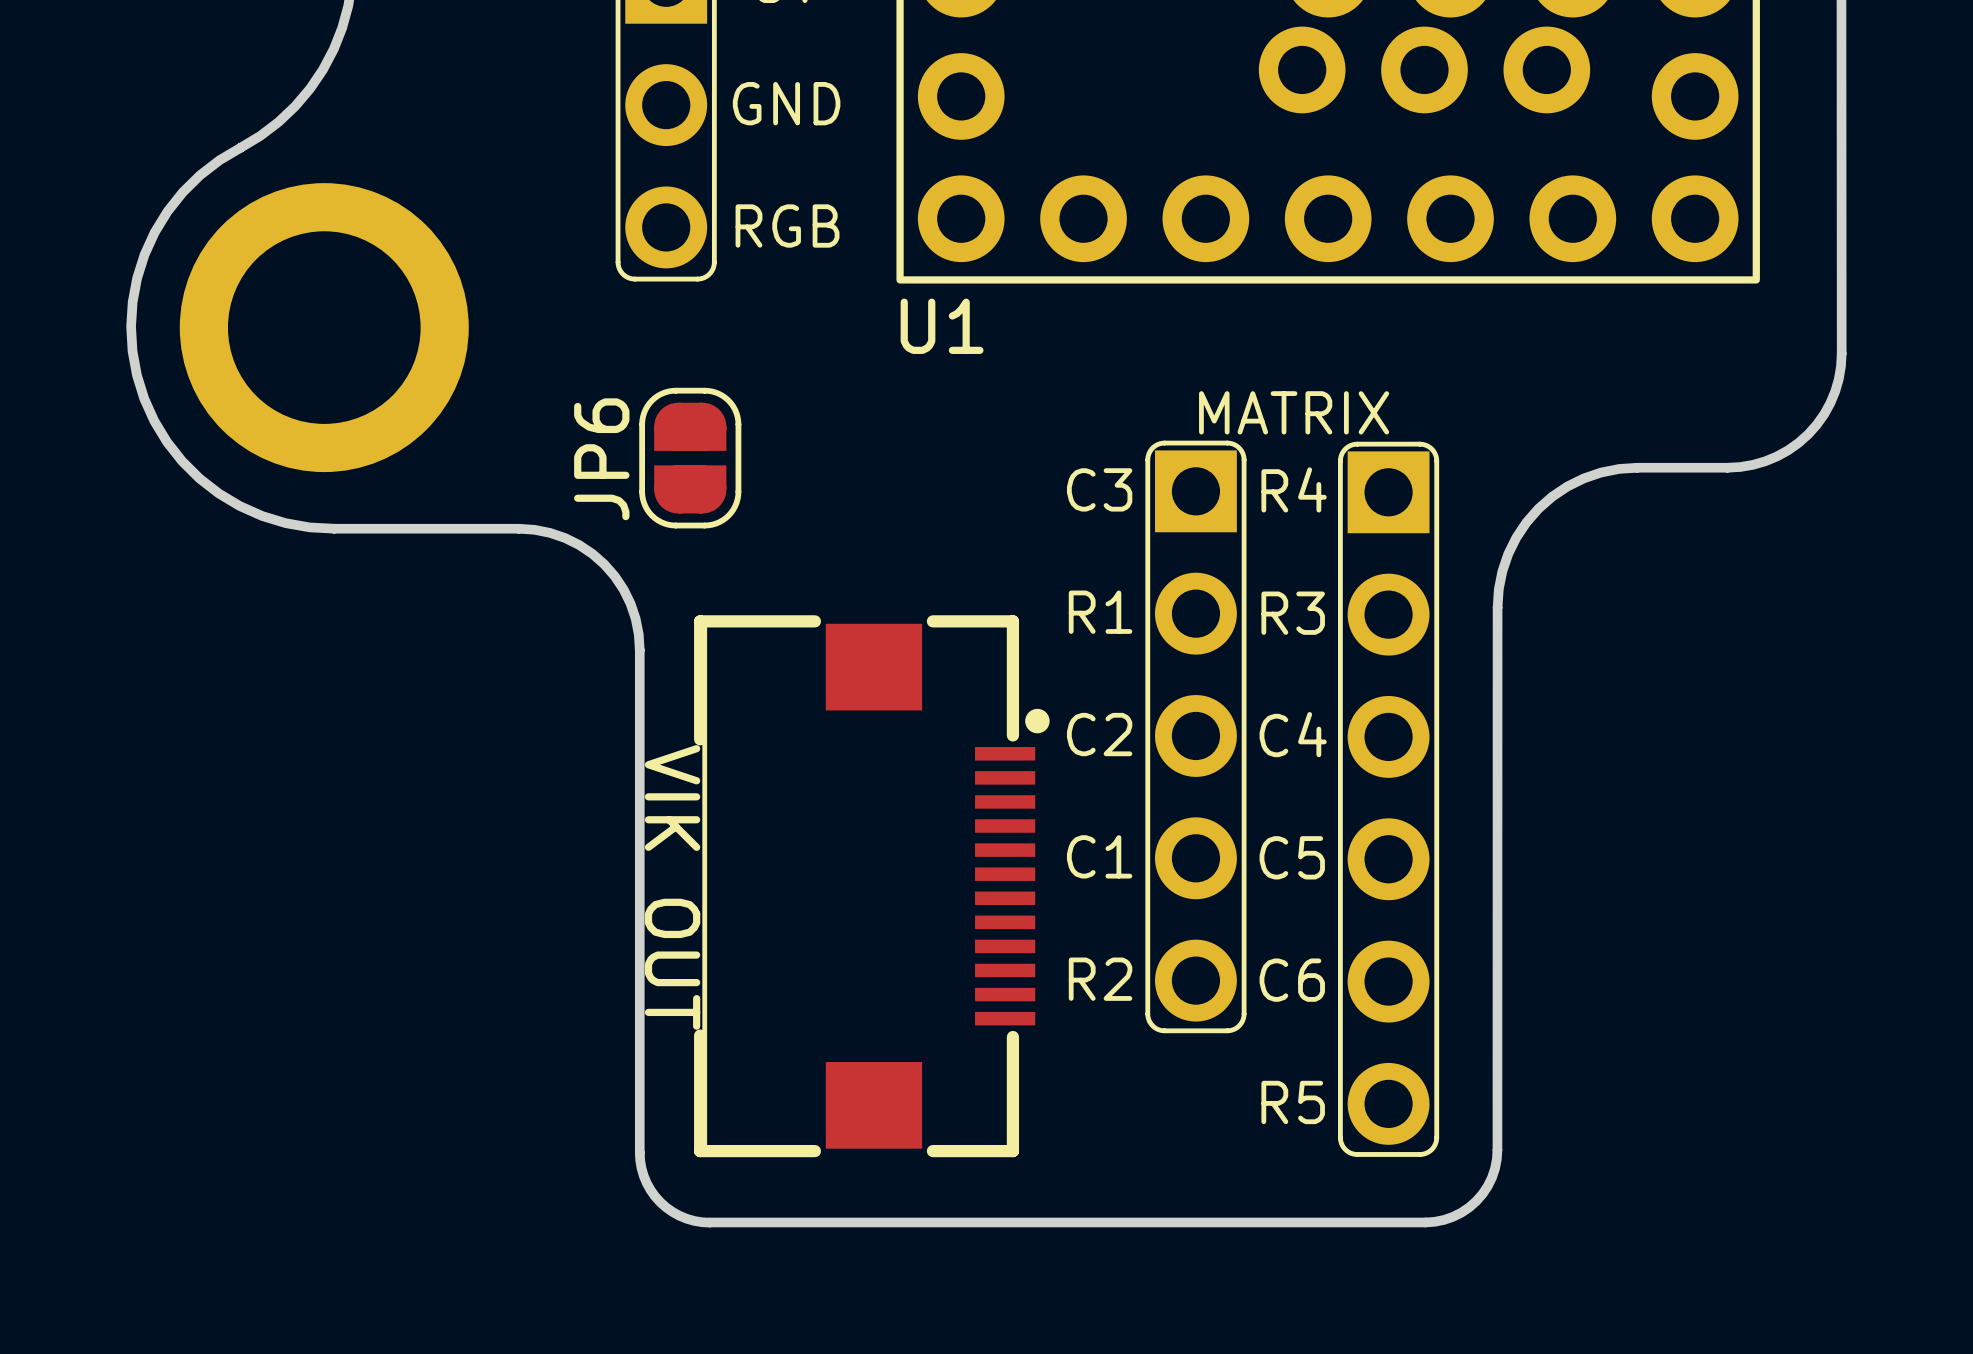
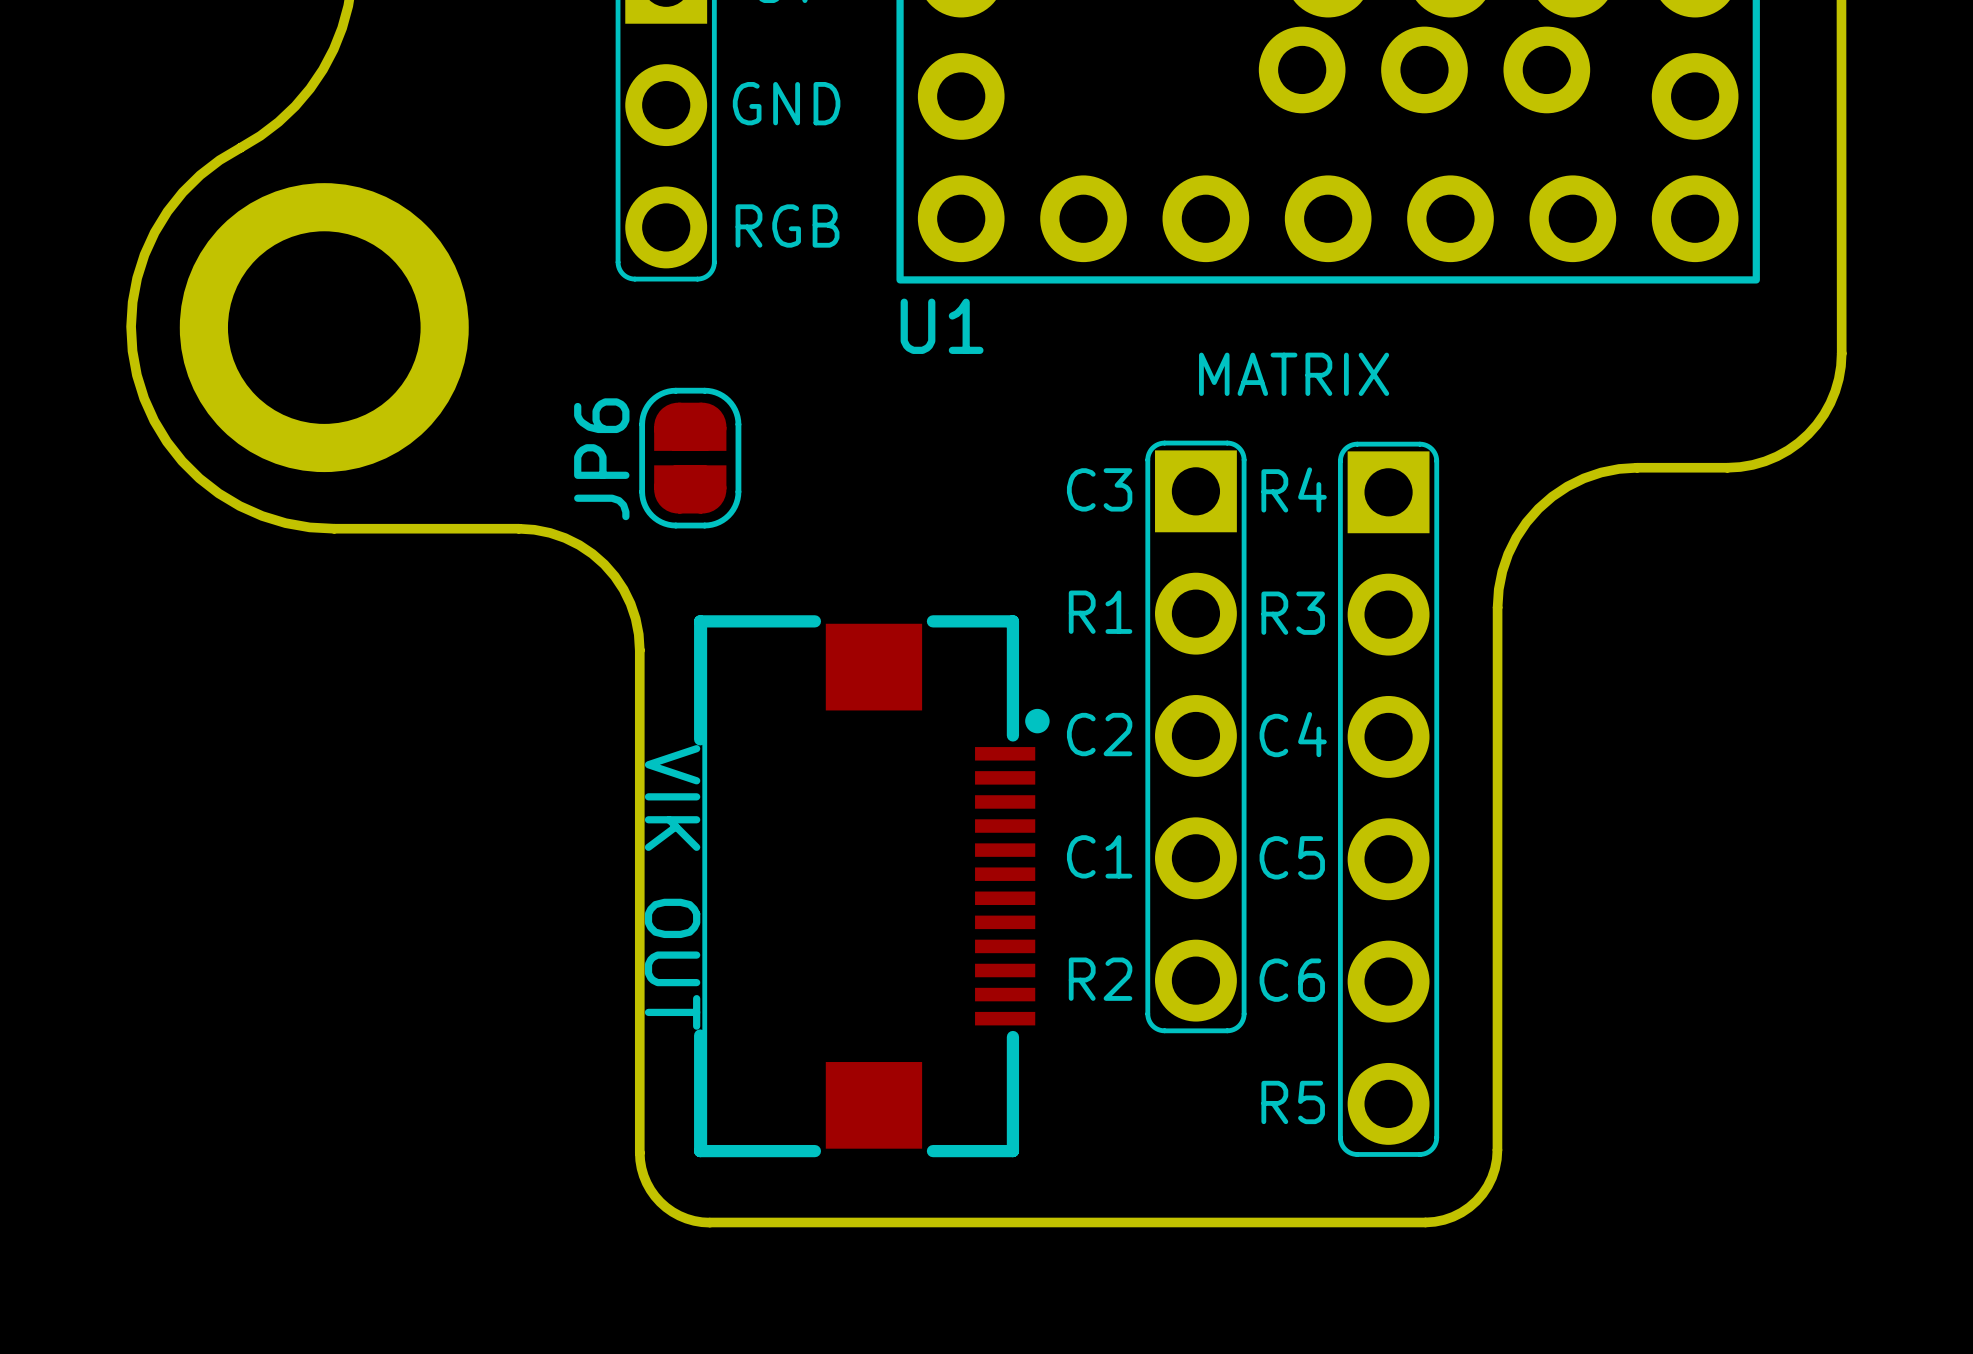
text position: MATRIX (1294, 412) -> MATRIX (1294, 374)

